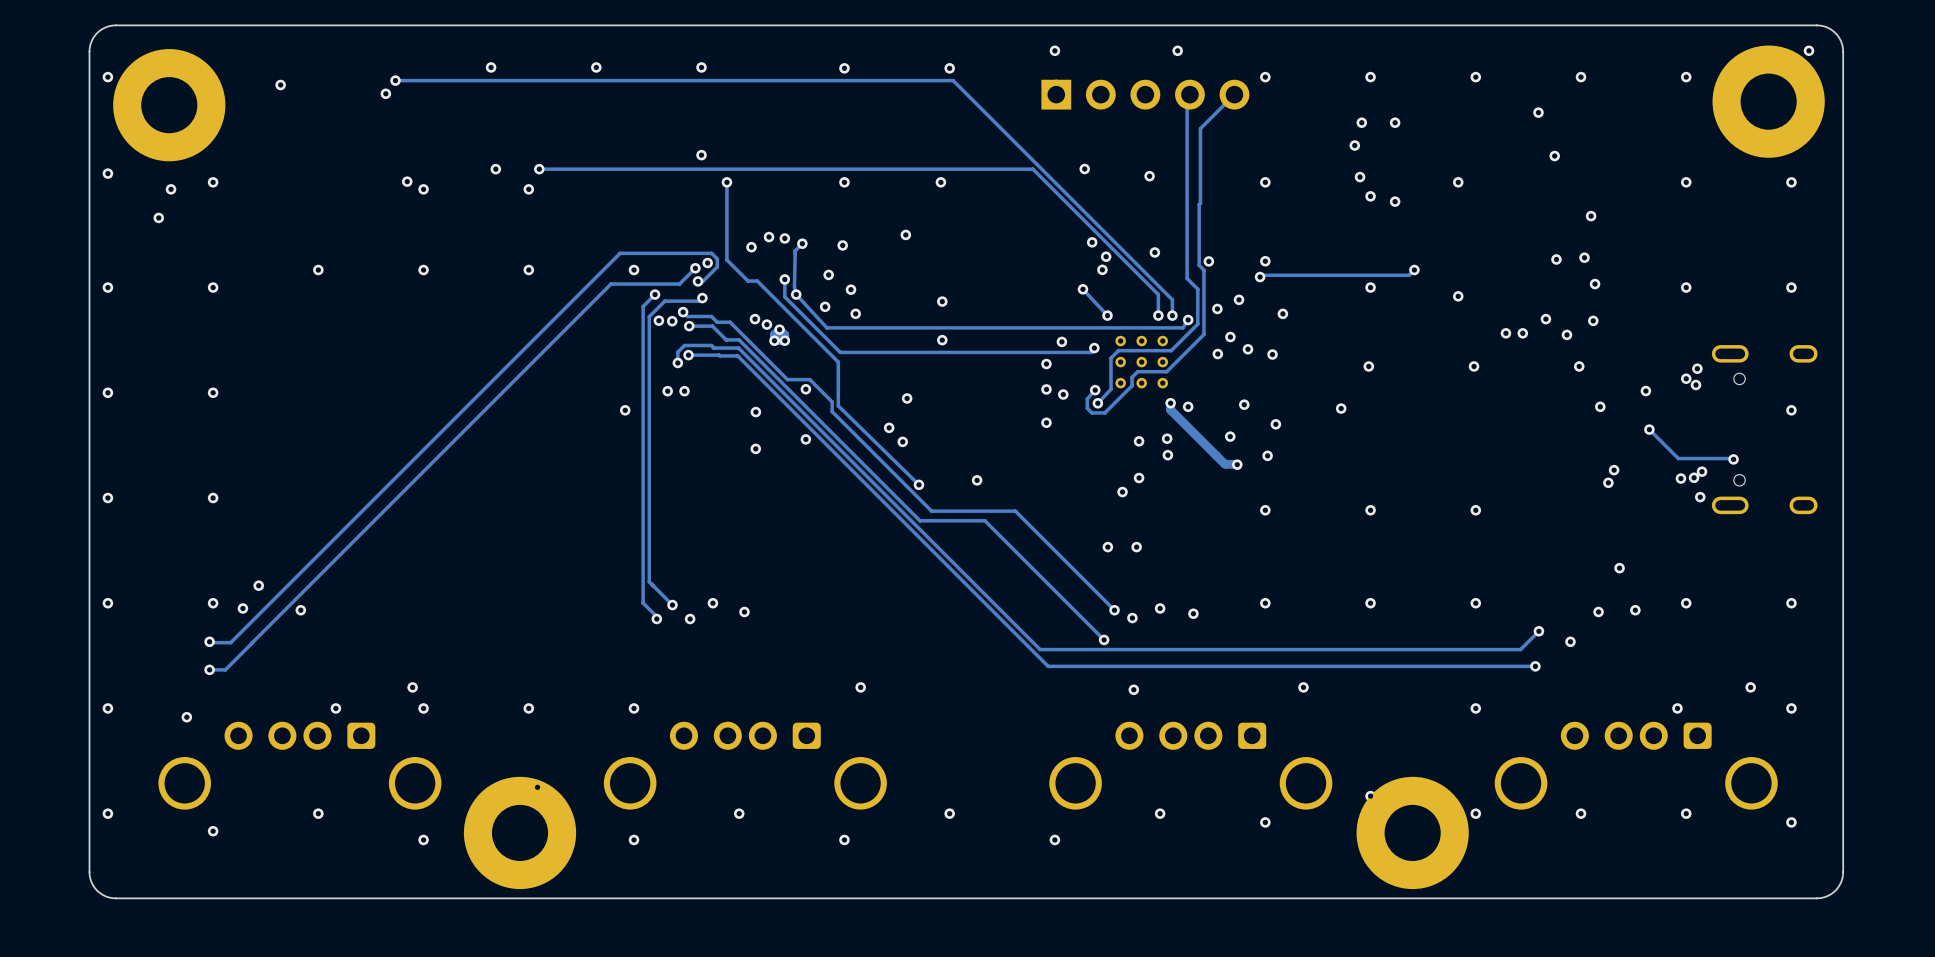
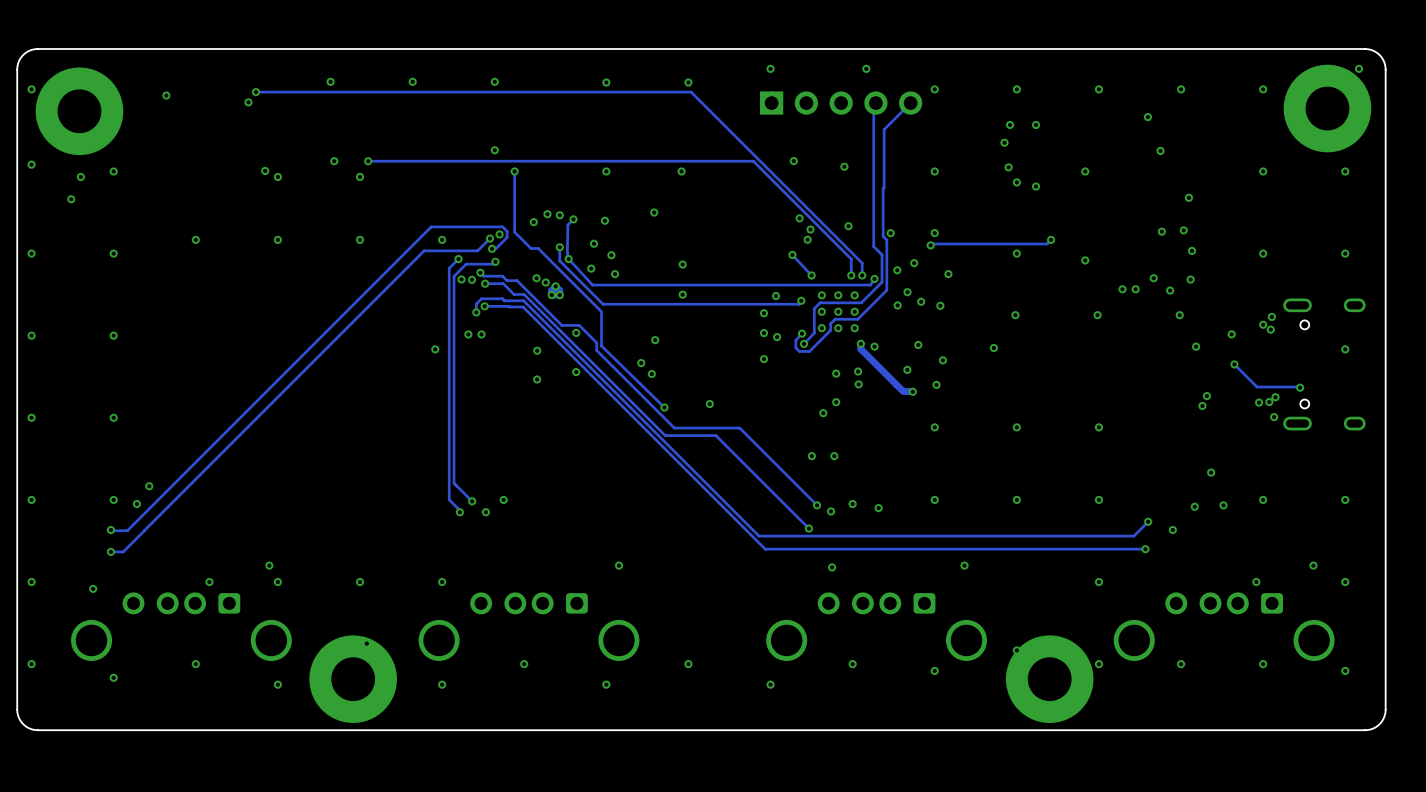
via: (300, 610) -> none
via: (744, 611) -> none

